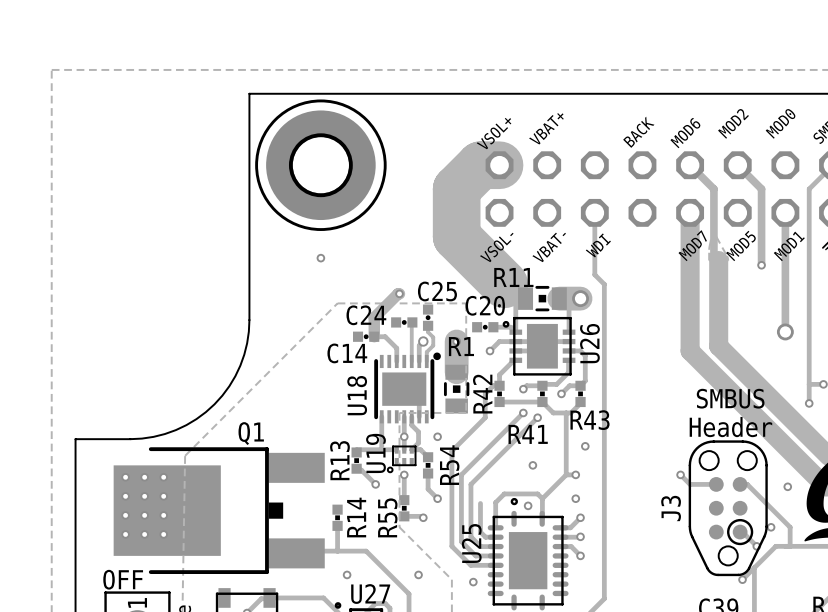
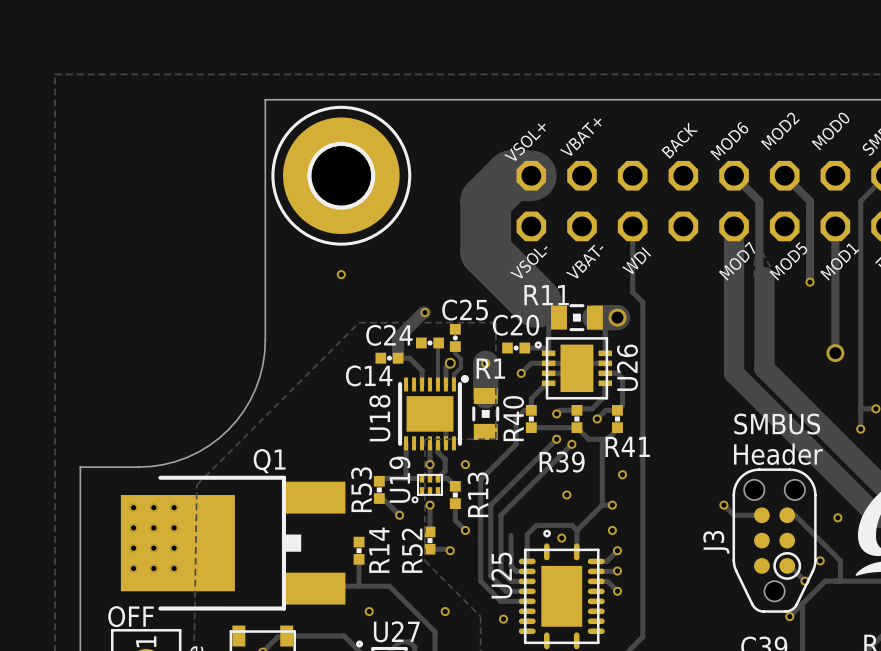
R42 name: R42 (482, 394) -> R40 (513, 418)
R43 name: R43 (590, 420) -> R41 (627, 446)
R41 name: R41 (528, 434) -> R39 (562, 462)
R13 name: R13 (339, 460) -> R53 (361, 489)
R54 name: R54 (449, 465) -> R13 (478, 494)
R55 name: R55 (387, 517) -> R52 (412, 550)

